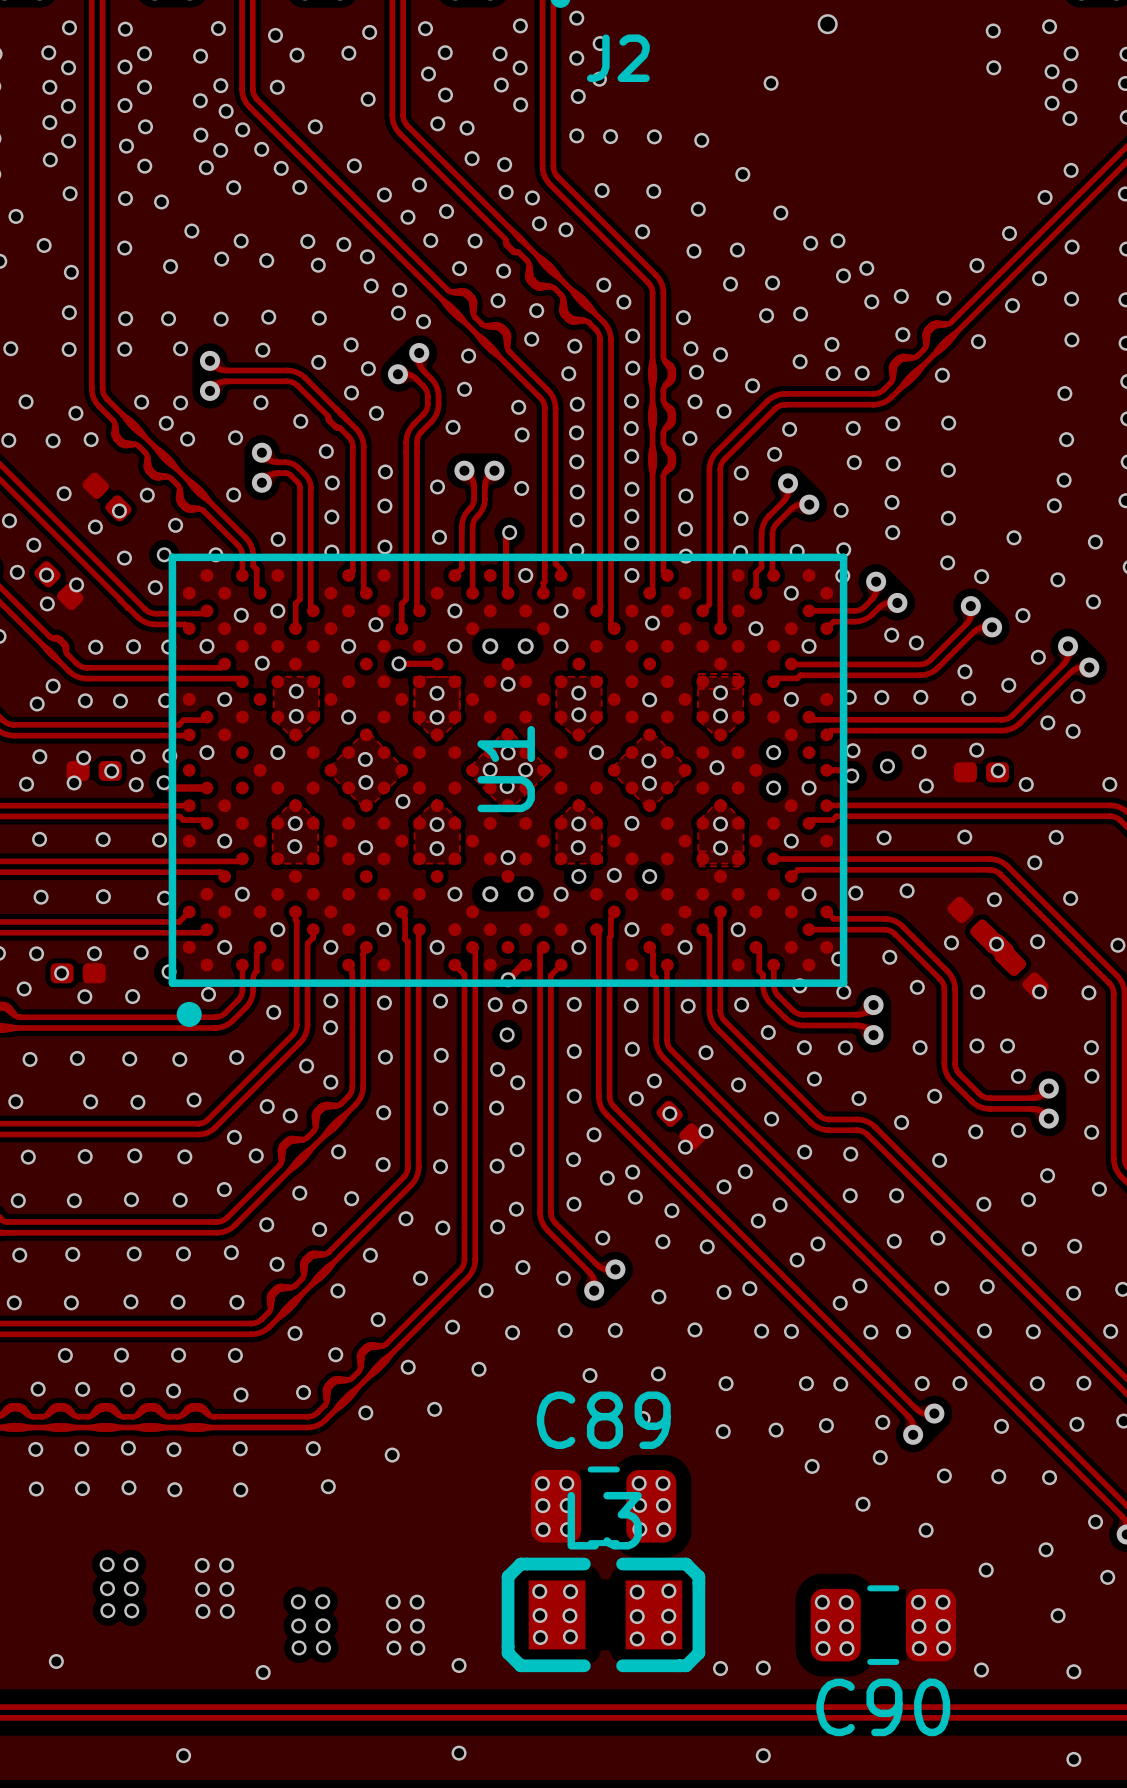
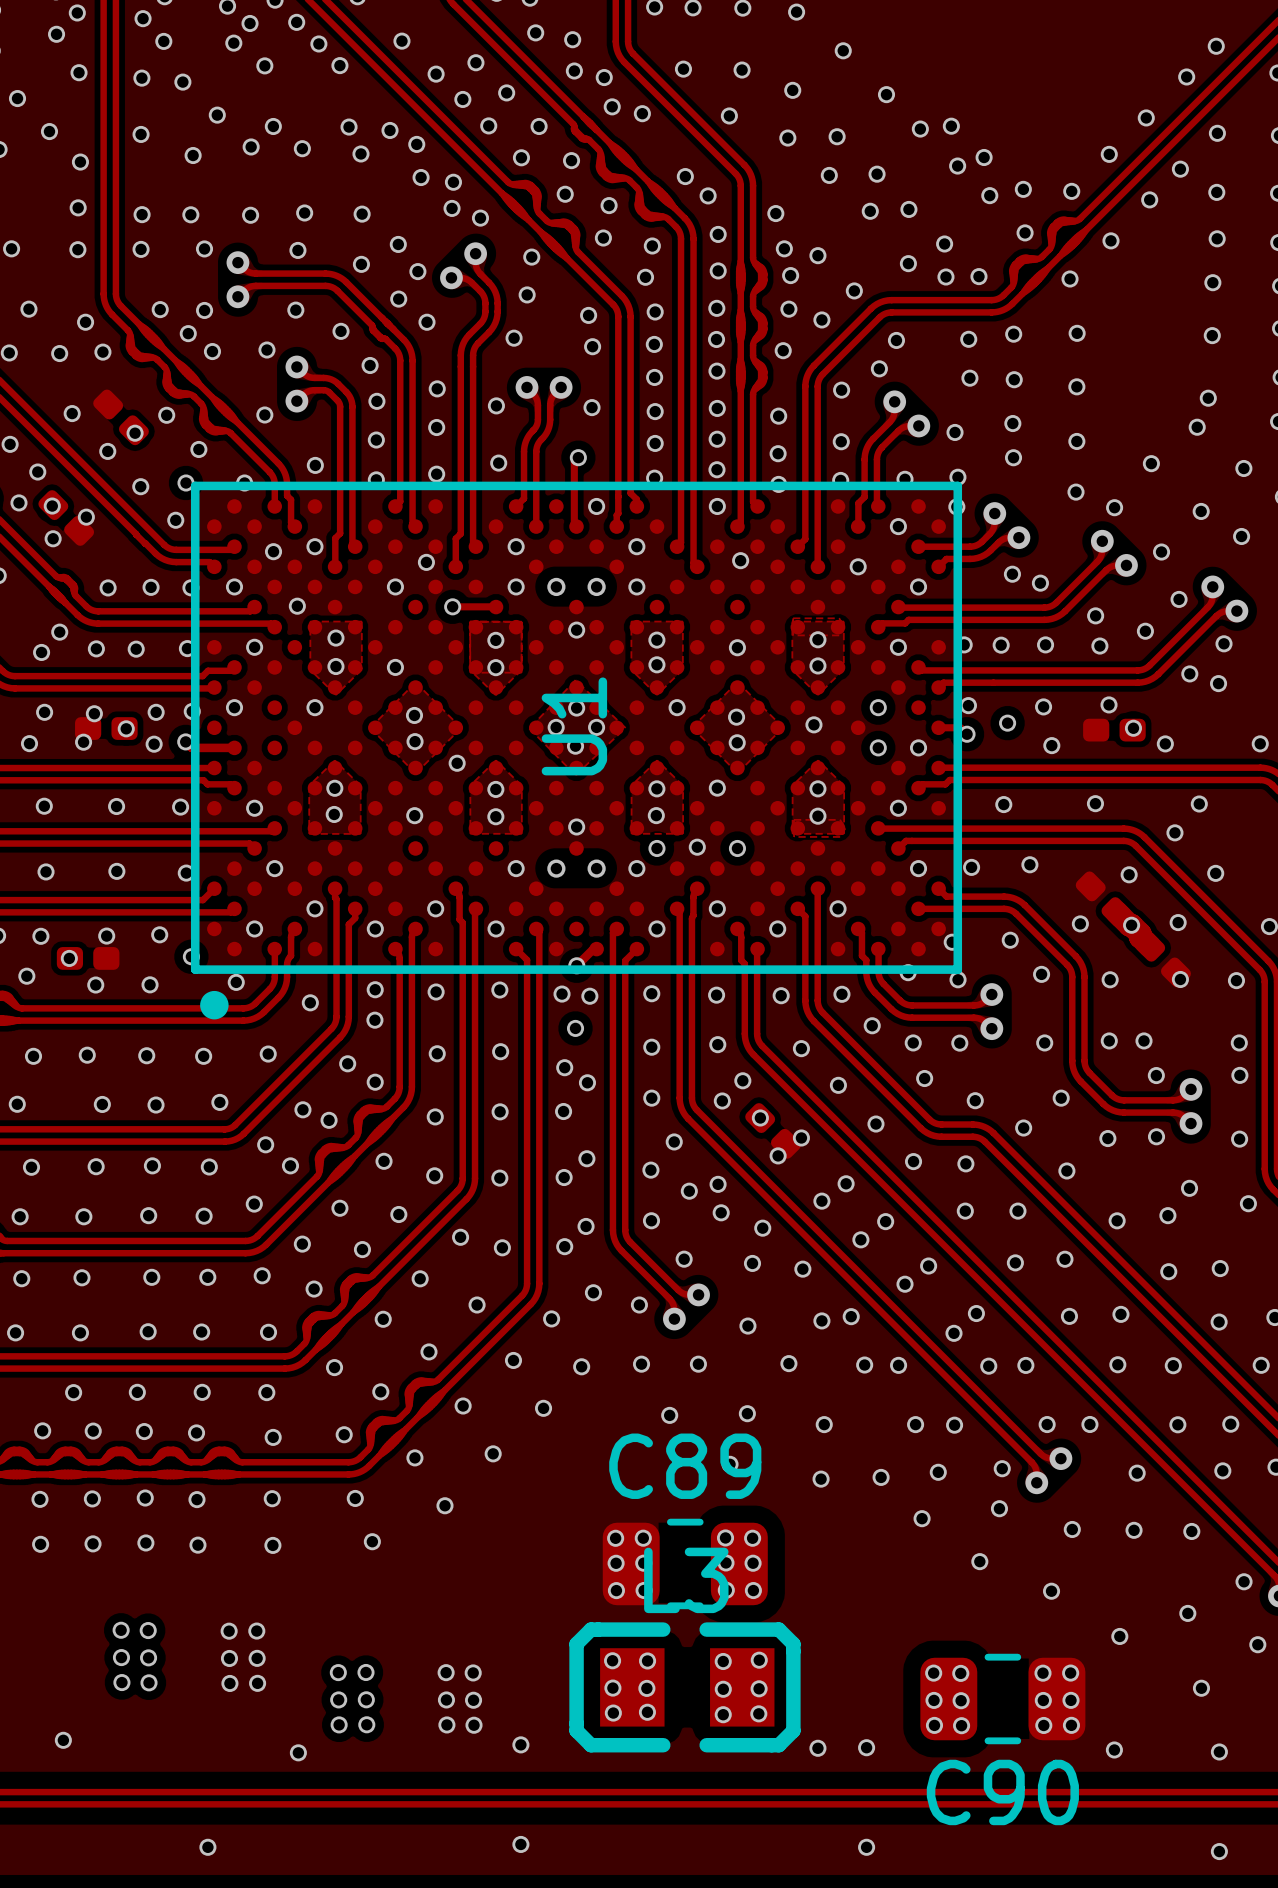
via position: (1064, 393) -> (1212, 282)
via position: (1066, 439) -> (1212, 335)

